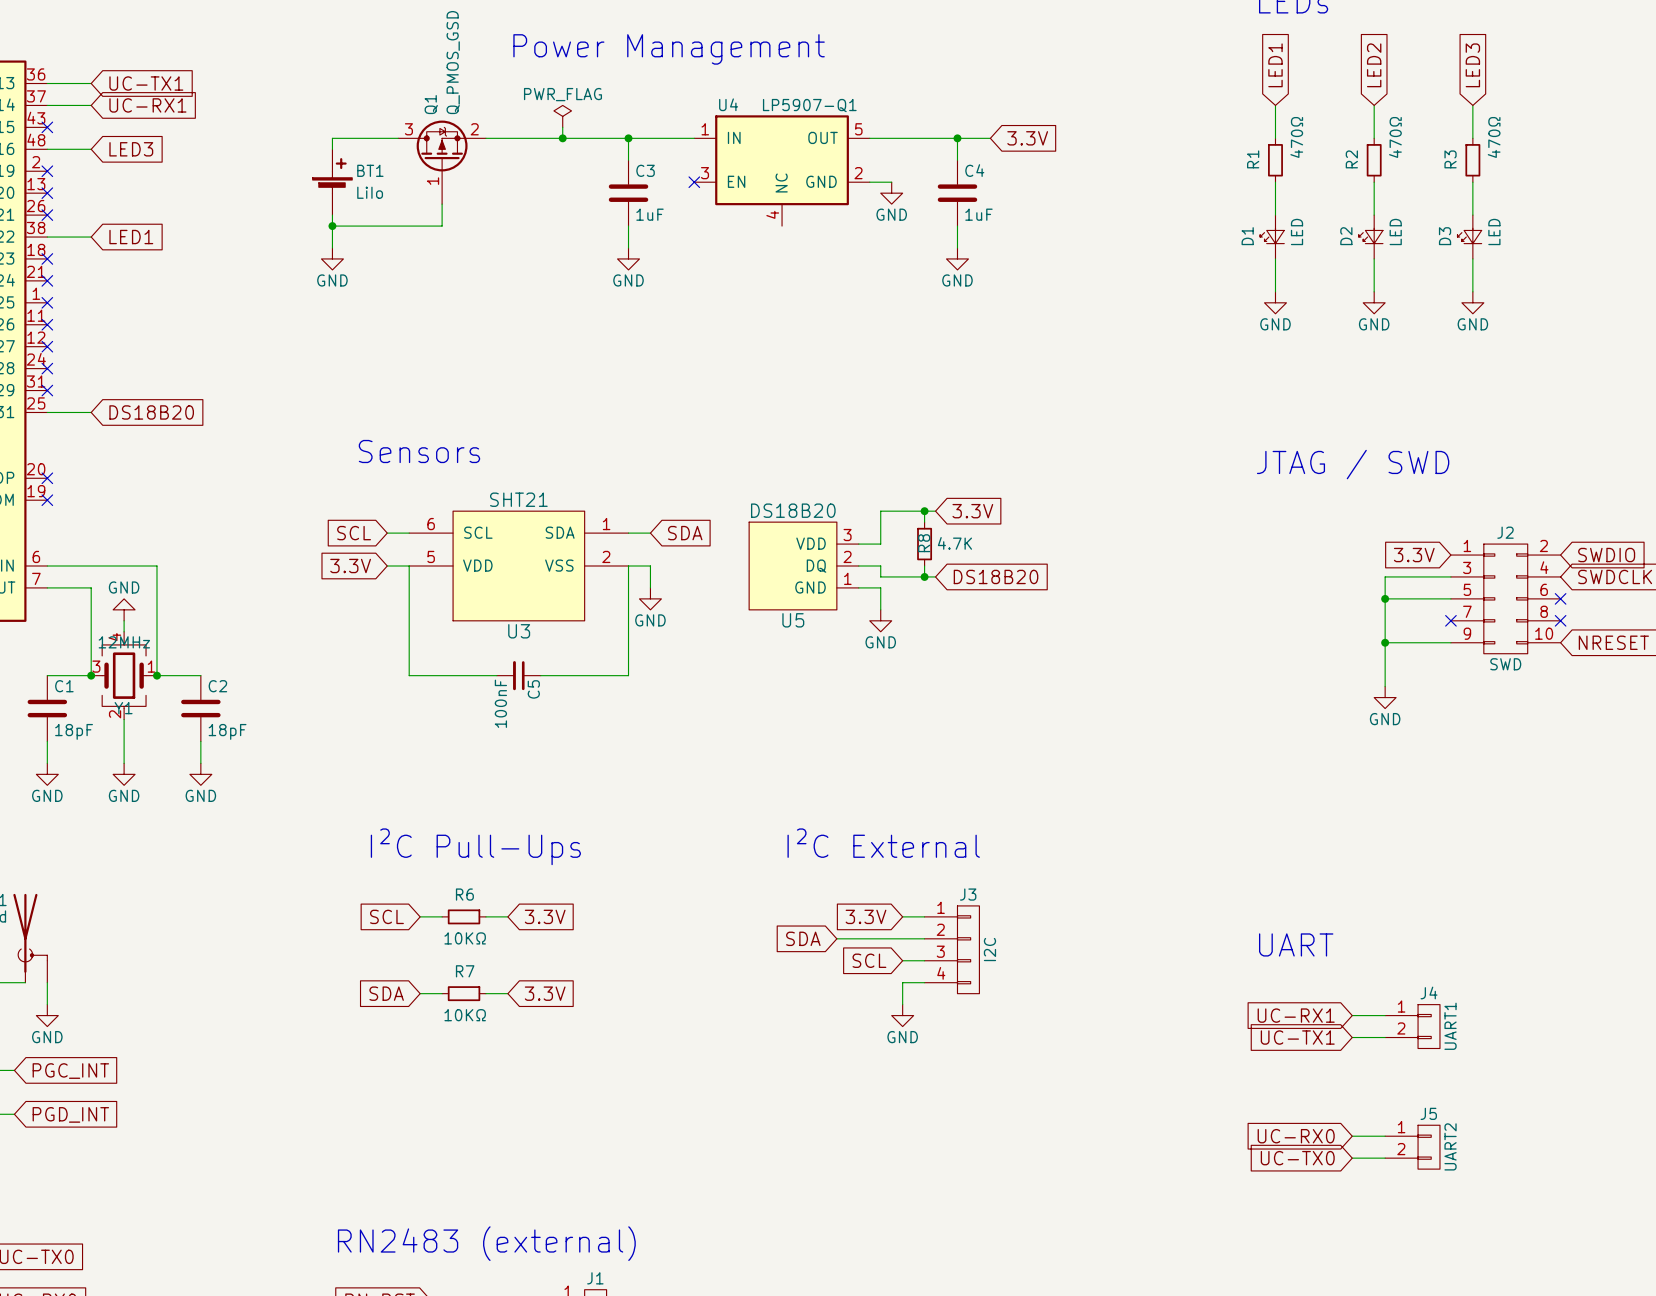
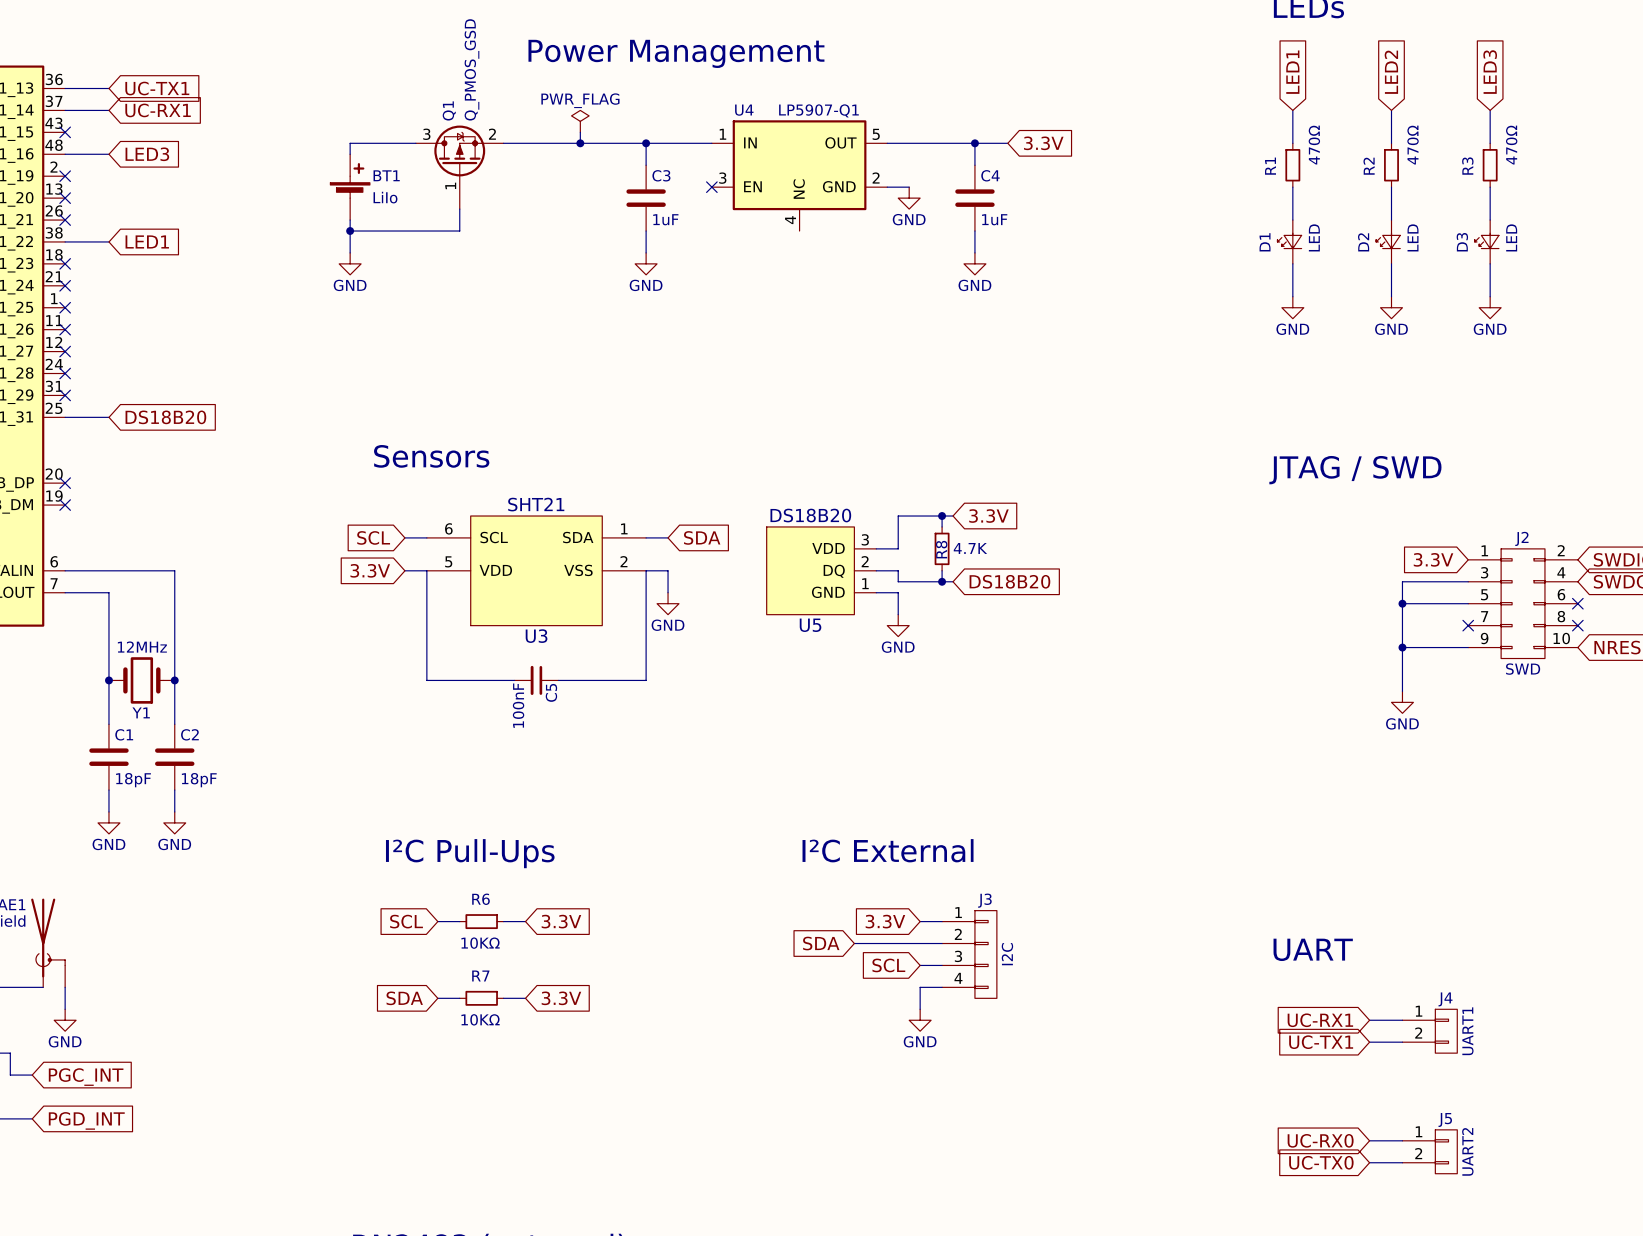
power symbol: GND (124, 609) -> none
wire: (124, 620) (124, 631) -> none
Y1 symbol: [91, 631, 157, 720] -> [108, 657, 175, 704]
wire: (47, 675) (91, 675) -> (108, 724) (108, 680)
wire: (156, 675) (200, 675) -> (174, 680) (174, 724)
C1 position: (47, 708) -> (108, 757)
C2 position: (200, 708) -> (174, 757)
wire: (124, 719) (124, 763) -> none
wire: (47, 741) (47, 763) -> (108, 790) (108, 811)
wire: (200, 741) (200, 763) -> (174, 790) (174, 811)
power symbol: GND (47, 774) -> none
power symbol: GND (124, 774) -> none
power symbol: GND (200, 774) -> none
power symbol: none -> GND (108, 822)
power symbol: none -> GND (174, 822)

